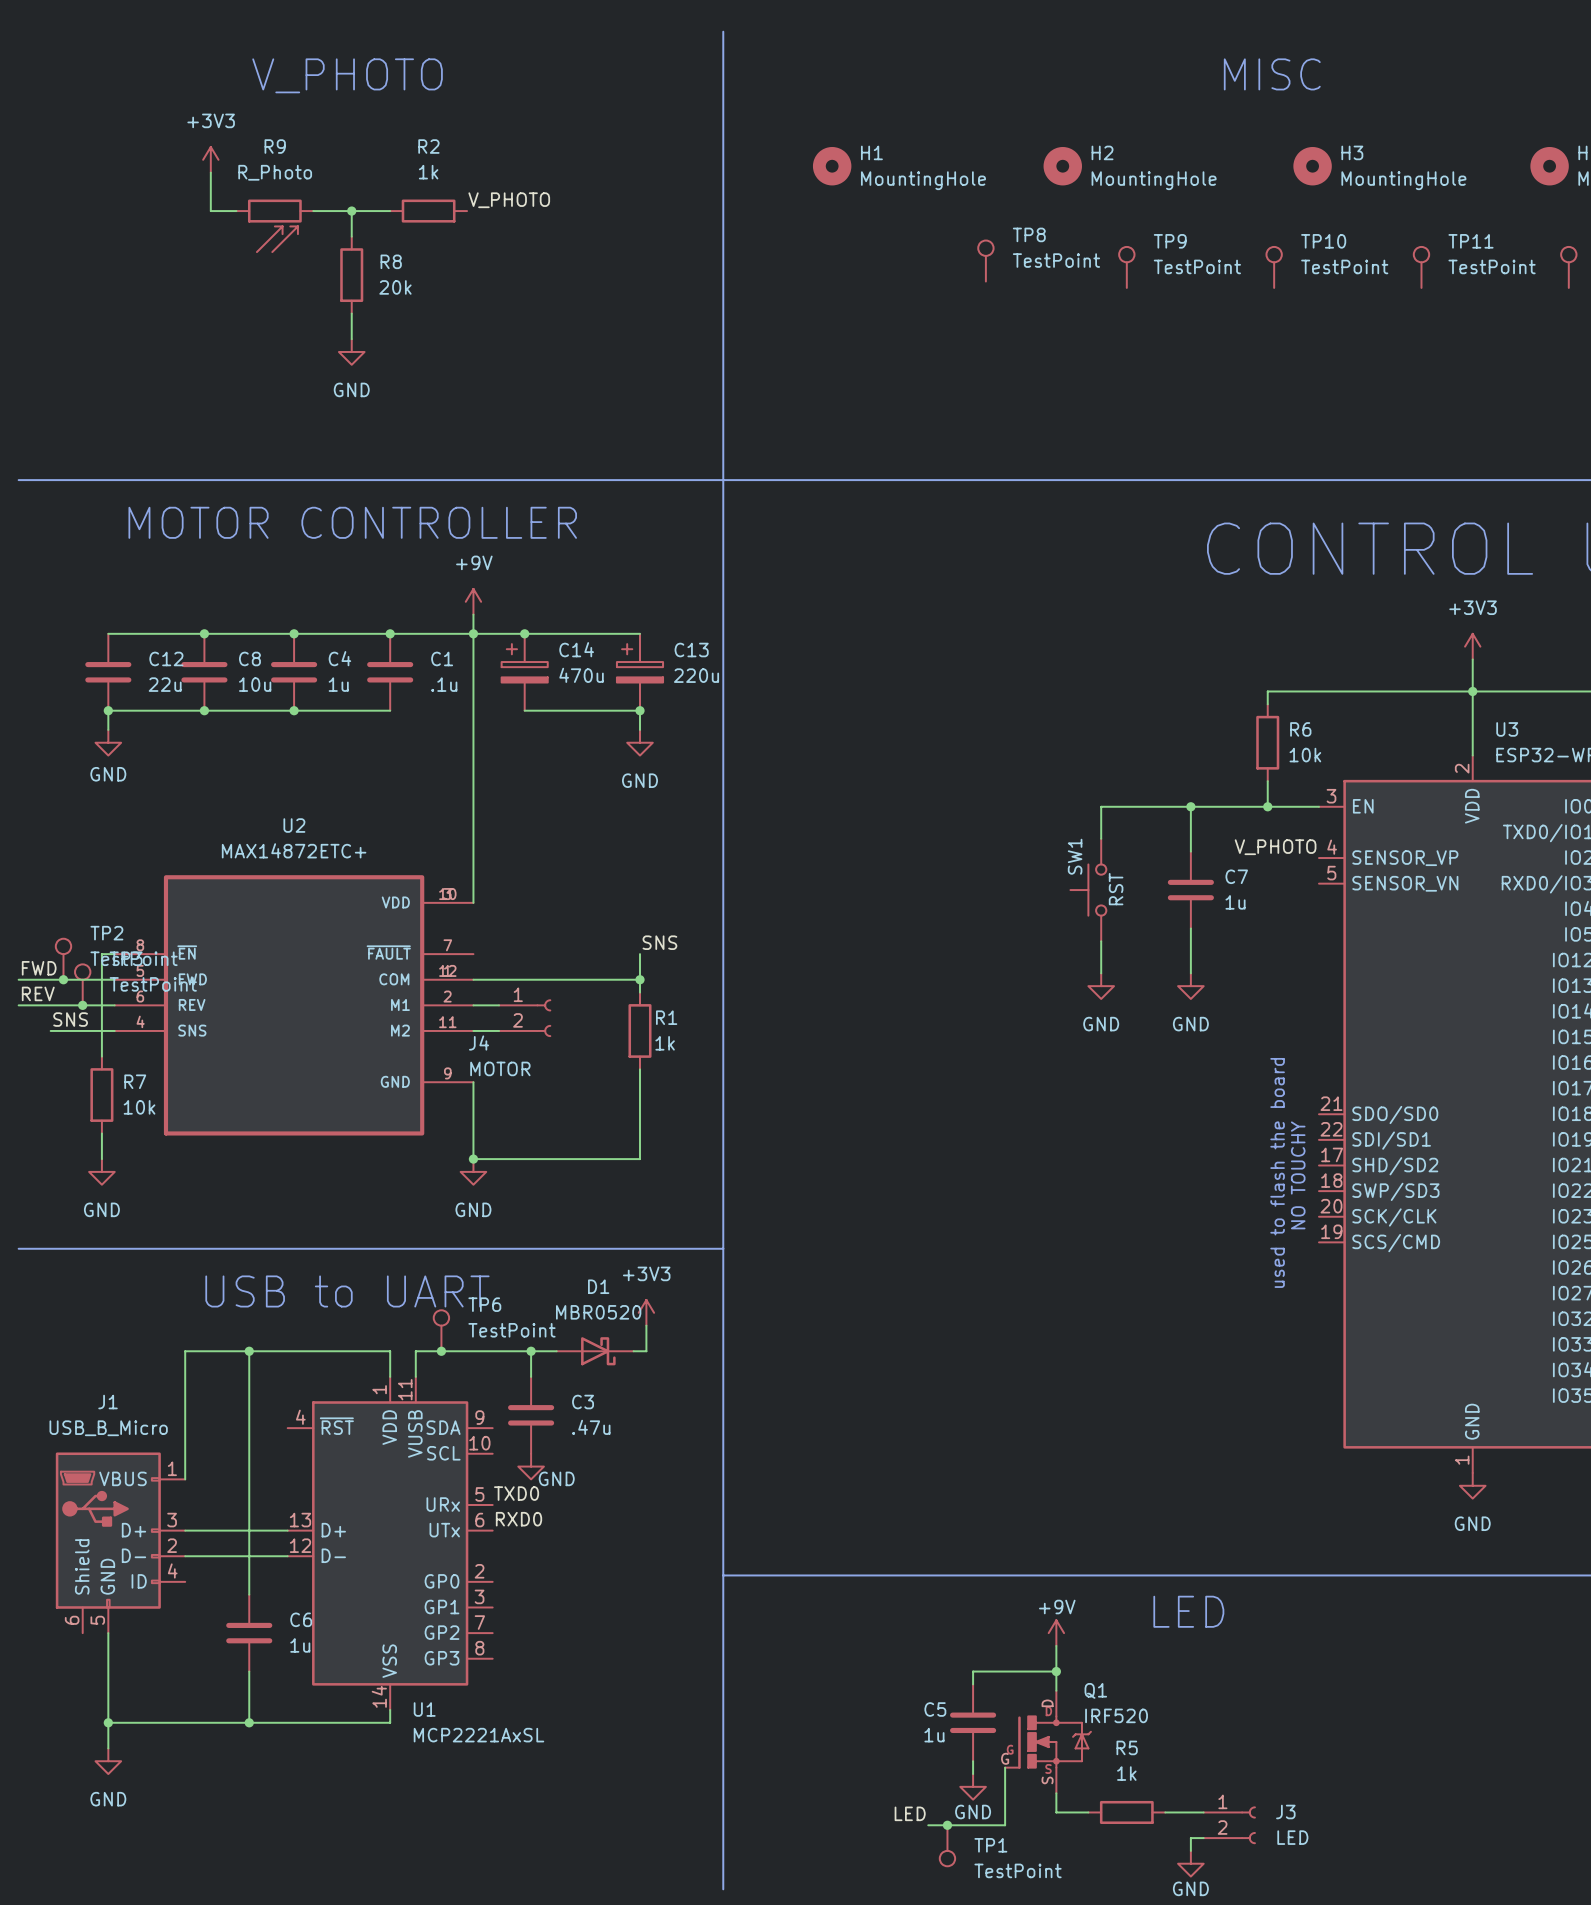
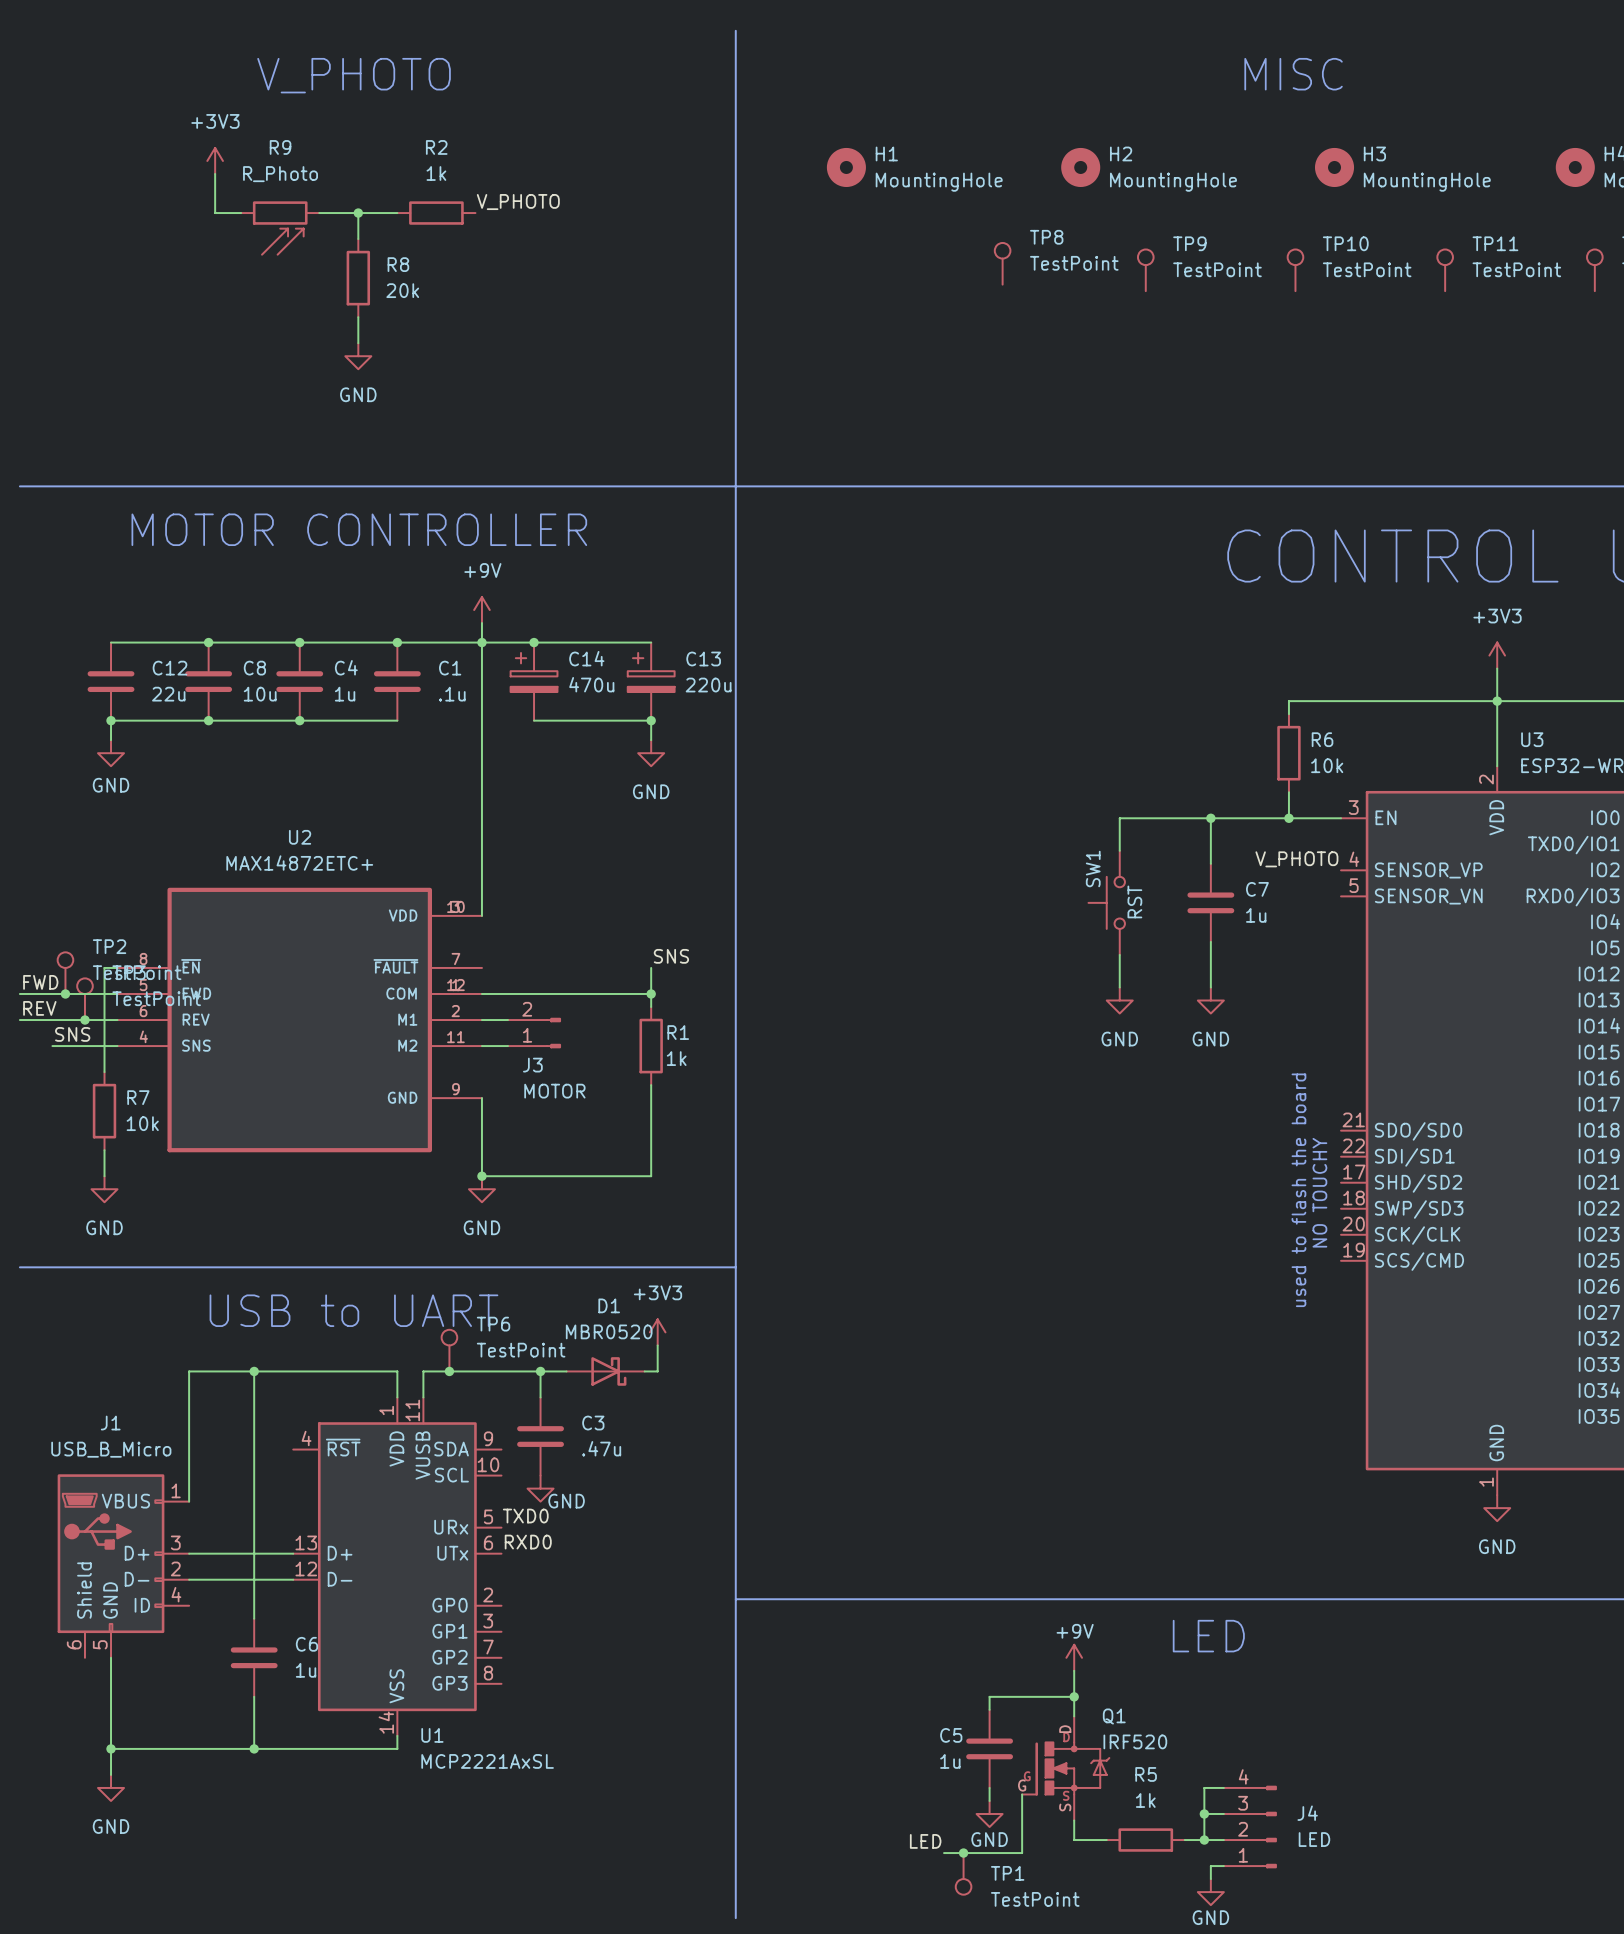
J4 symbol: [499, 999, 552, 1037] -> [1223, 1785, 1277, 1869]
J4 name position: J4 (479, 1043) -> J4 (1307, 1813)
J4 value: MOTOR (500, 1068) -> LED (1314, 1839)
wire: none -> (1223, 1787) (1204, 1787) (1204, 1840)
wire: none -> (1204, 1813) (1223, 1813)
junction: none -> (1204, 1813)
J3 symbol: [1203, 1806, 1256, 1844] -> [508, 1017, 561, 1049]
J3 name position: J3 (1285, 1811) -> J3 (532, 1065)
junction: none -> (1204, 1840)
J3 value: LED (1292, 1837) -> MOTOR (554, 1091)

